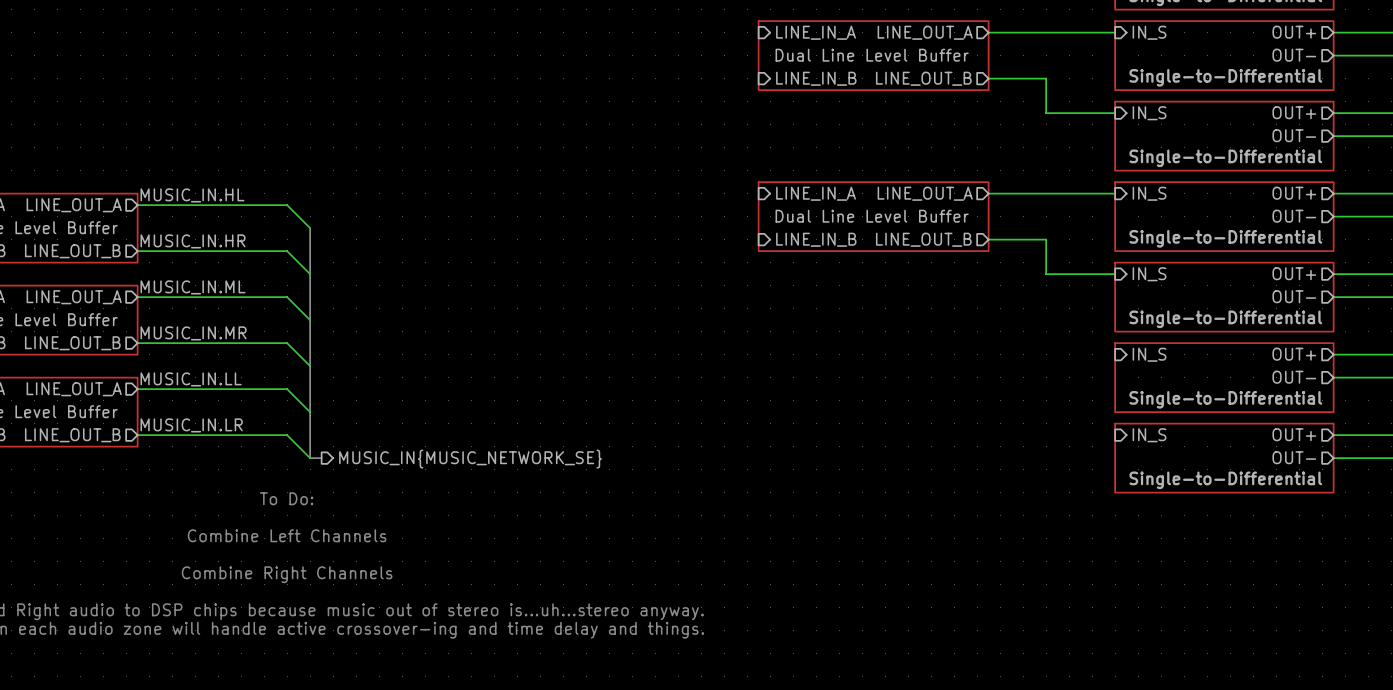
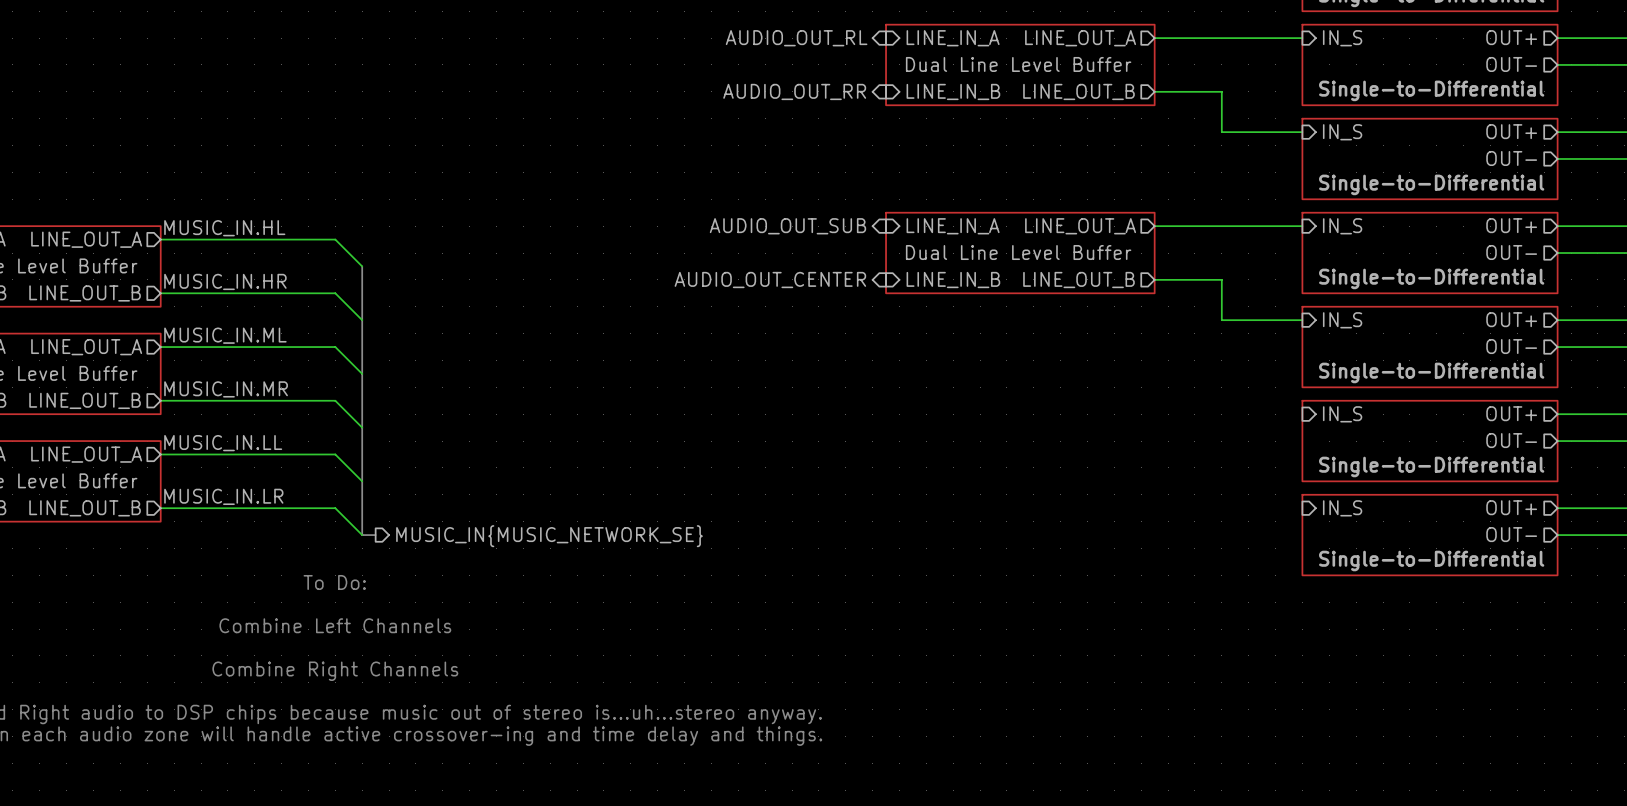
hierarchical label: none -> AUDIO_OUT_RL (796, 38)
hierarchical label: none -> AUDIO_OUT_RR (794, 91)
hierarchical label: none -> AUDIO_OUT_SUB (787, 226)
hierarchical label: none -> AUDIO_OUT_CENTER (770, 280)

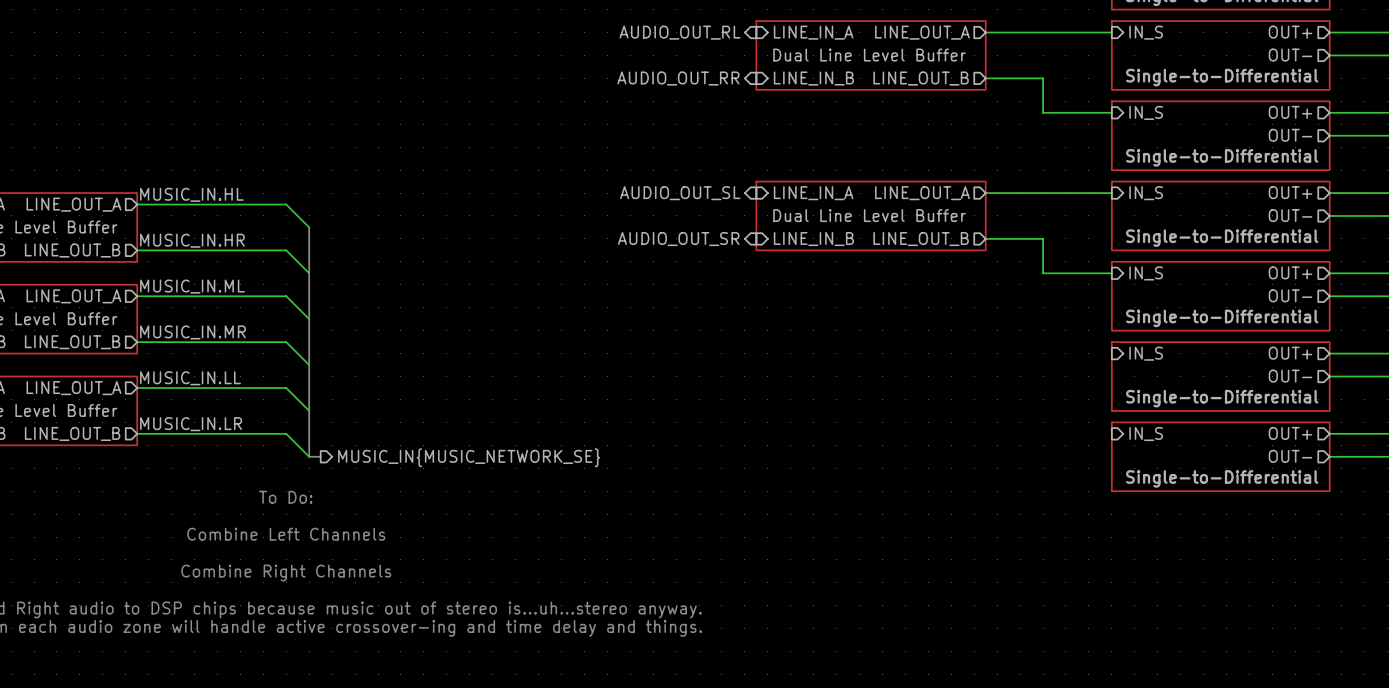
hierarchical label: AUDIO_OUT_SUB (787, 226) -> AUDIO_OUT_SL (680, 193)
hierarchical label: AUDIO_OUT_CENTER (770, 280) -> AUDIO_OUT_SR (678, 239)

